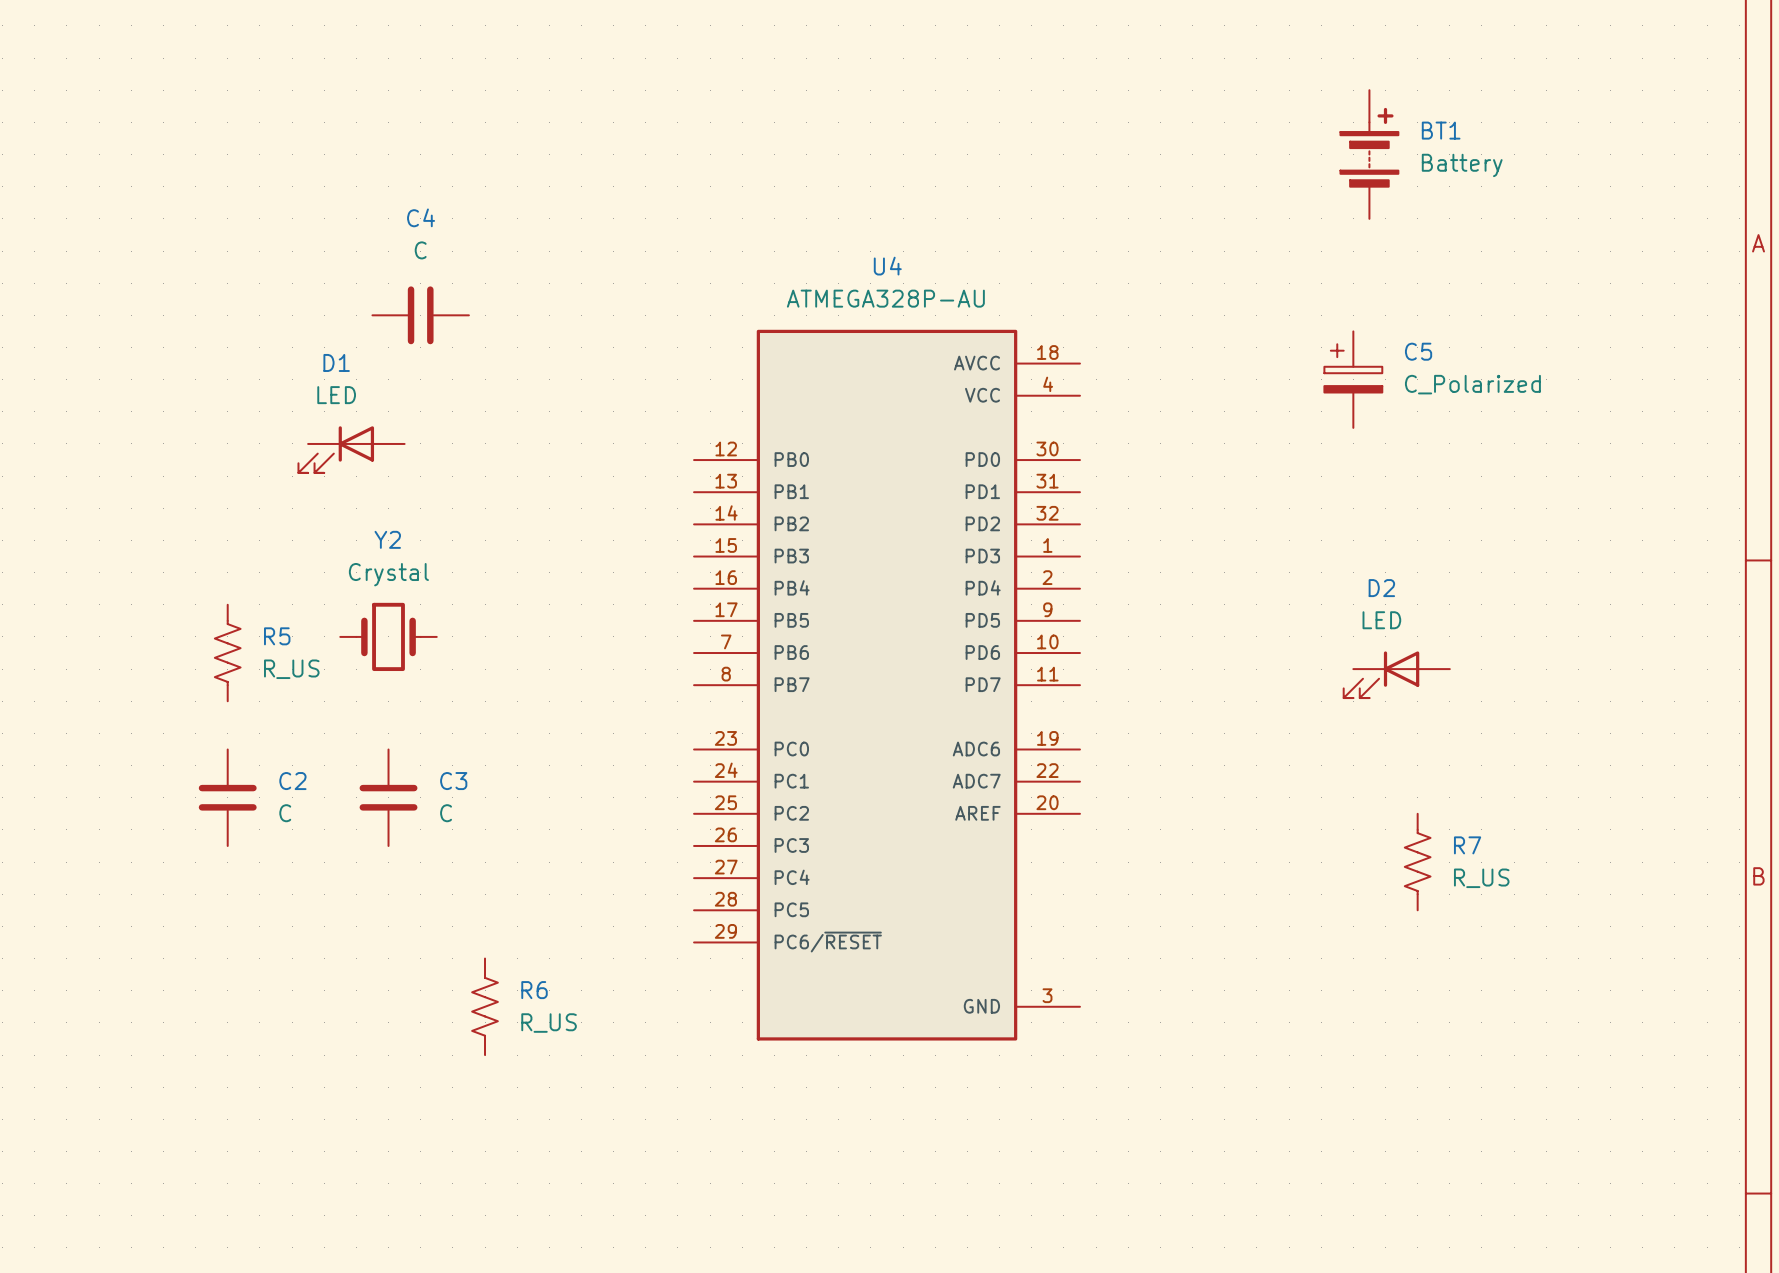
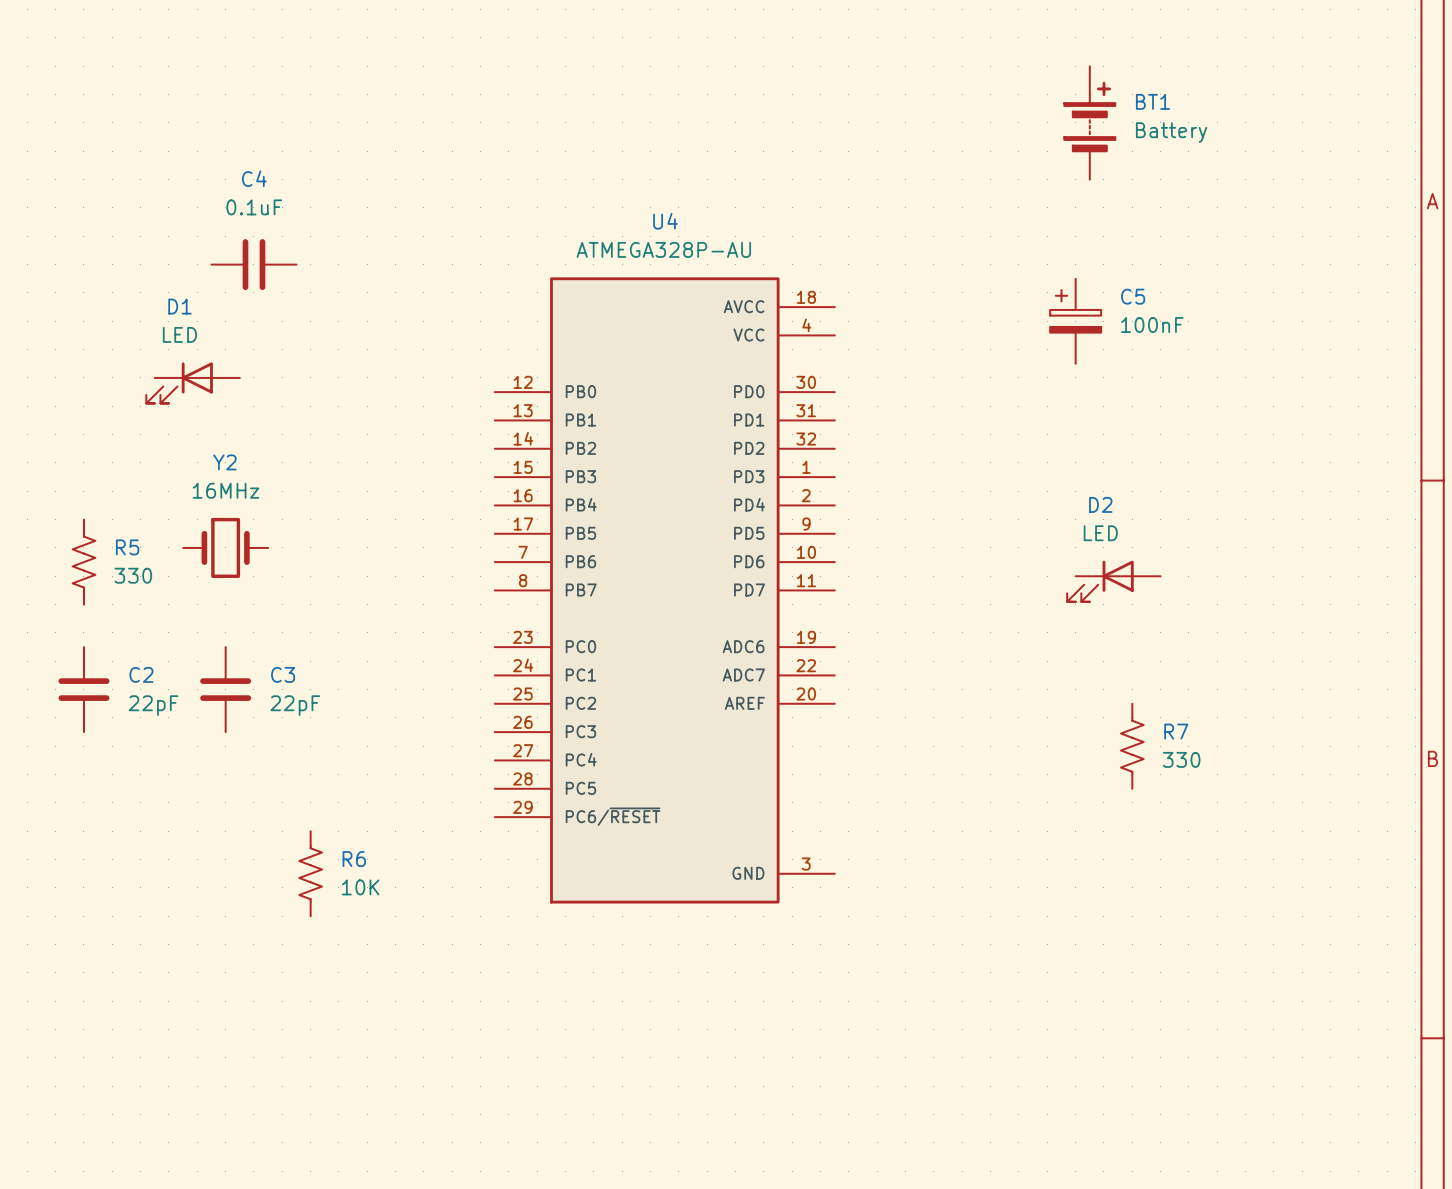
C4 value: C (420, 250) -> 0.1uF (254, 207)
C5 value: C_Polarized (1472, 384) -> 100nF (1152, 324)
Y2 value: Crystal (388, 574) -> 16MHz (225, 490)
R5 value: R_US (291, 669) -> 330 (133, 575)
C2 value: C (285, 813) -> 22pF (153, 705)
C3 value: C (446, 813) -> 22pF (295, 705)
R7 value: R_US (1481, 878) -> 330 (1181, 759)
R6 value: R_US (549, 1023) -> 10K (360, 887)

